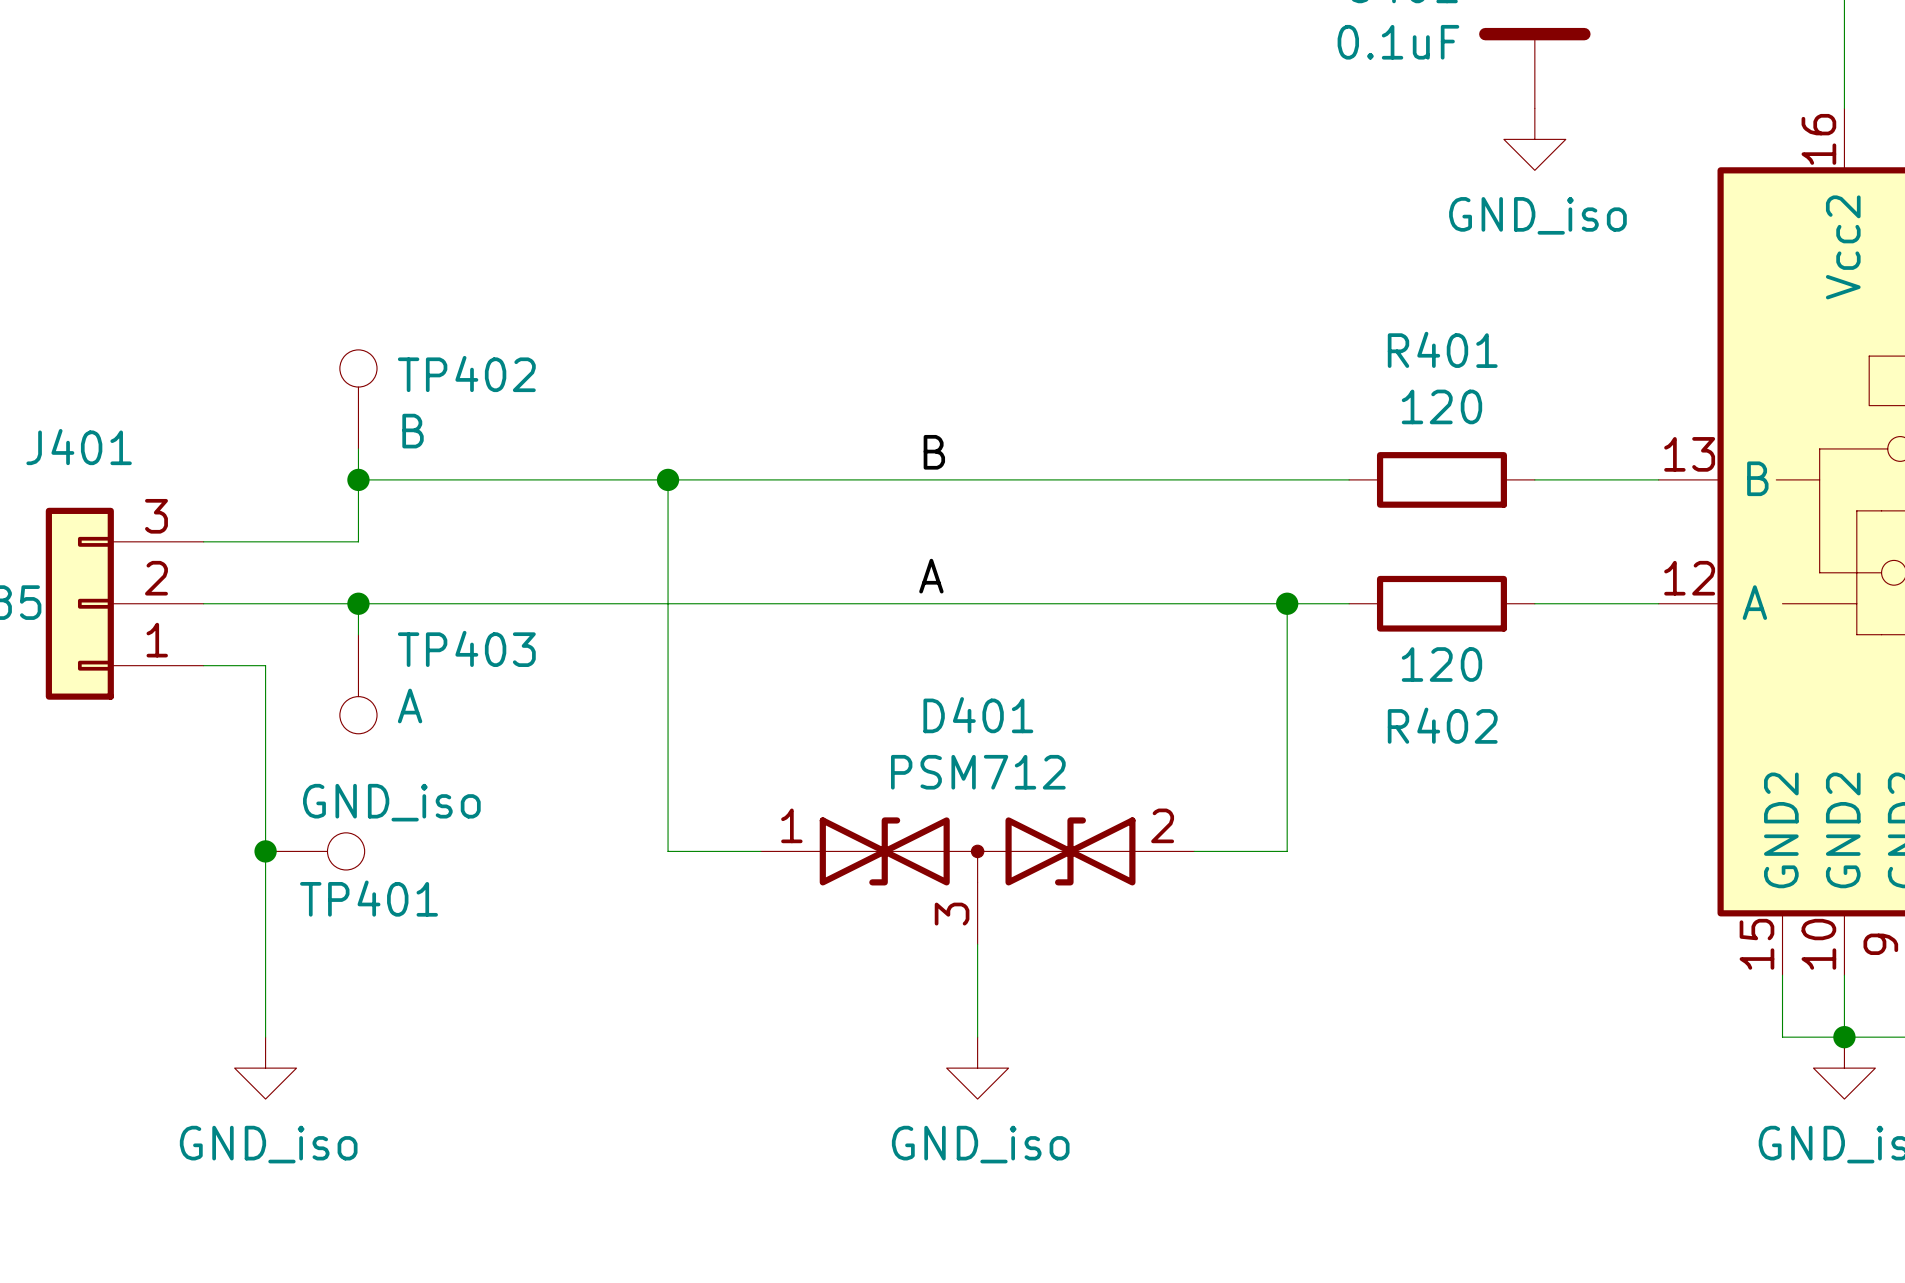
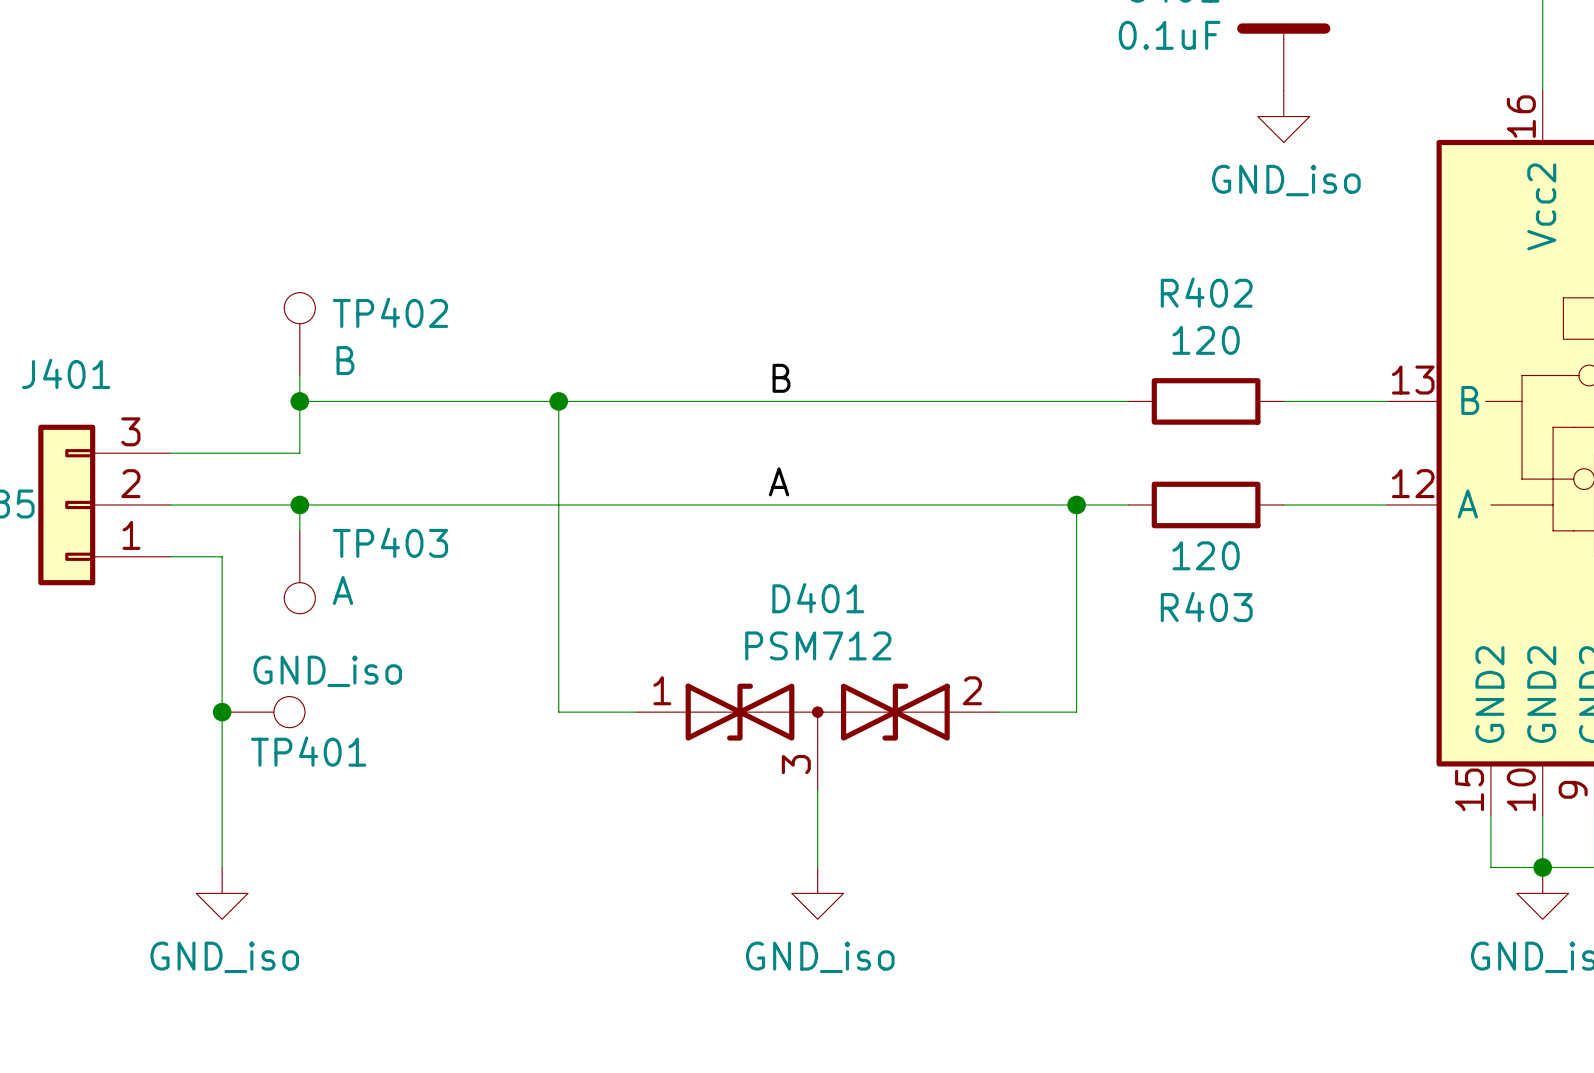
R401 name: R401 (1442, 349) -> R402 (1206, 292)
R402 name: R402 (1442, 725) -> R403 (1206, 606)

